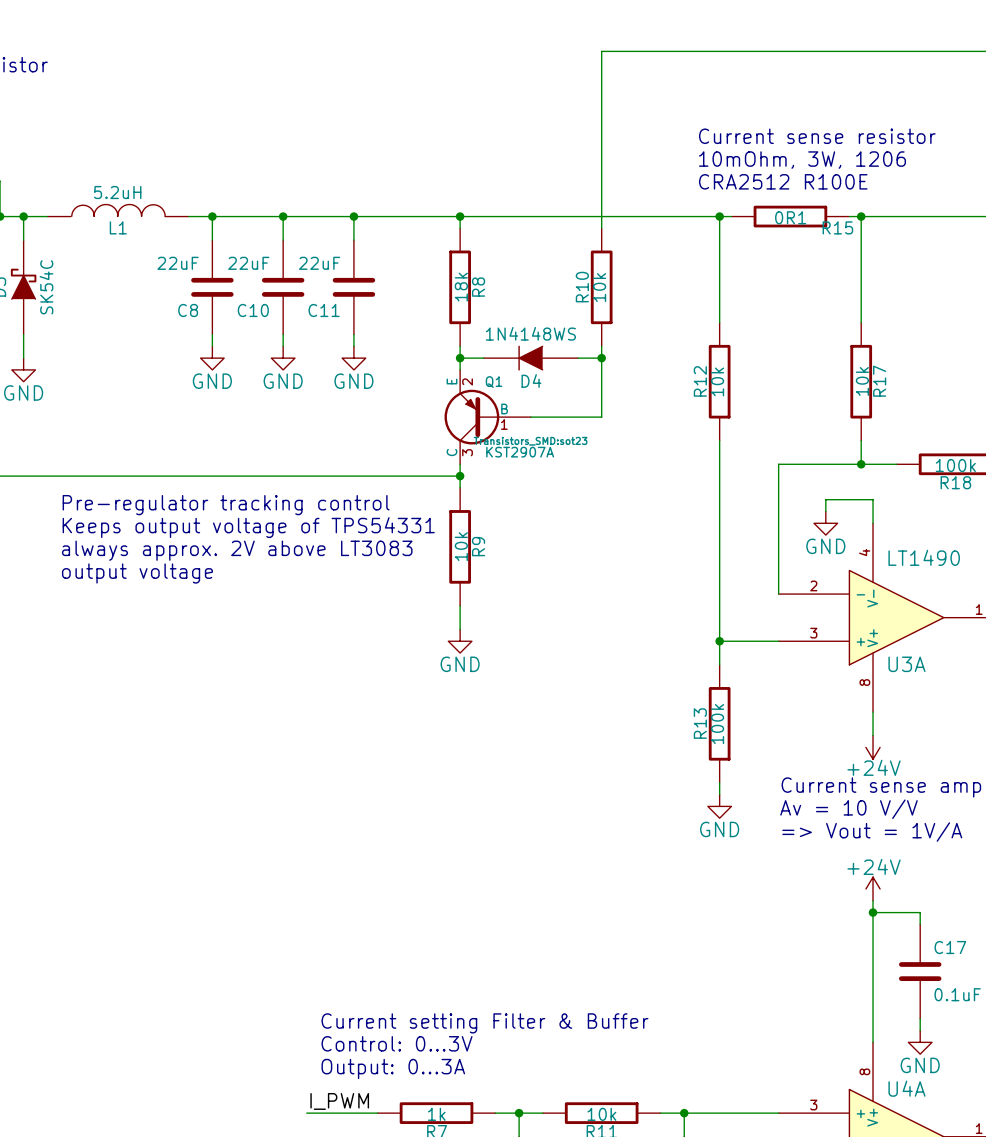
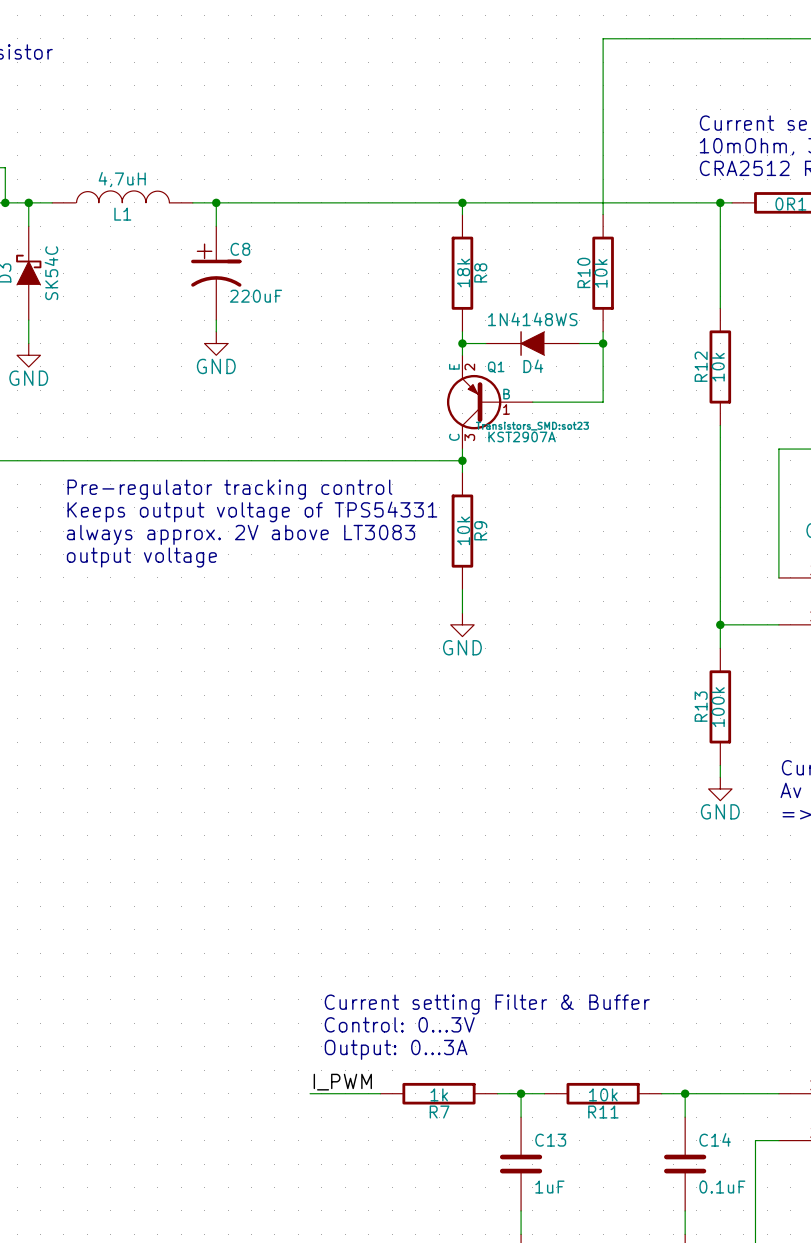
L1 value: 5.2uH (117, 192) -> 4,7uH (122, 179)
wire: (283, 216) (283, 240) -> none
junction: (283, 216) -> none
wire: (353, 216) (353, 240) -> none
junction: (353, 216) -> none
C8 symbol: [191, 240, 234, 335] -> [191, 226, 242, 321]
C8 value: 22uF (178, 263) -> 220uF (256, 296)
C10: 22uF (283, 287) -> none
C11: 22uF (353, 287) -> none
C8 name position: C8 (188, 310) -> C8 (240, 249)
wire: (283, 334) (283, 346) -> none
wire: (353, 334) (353, 346) -> none
power symbol: GND (283, 358) -> none
power symbol: GND (353, 358) -> none

